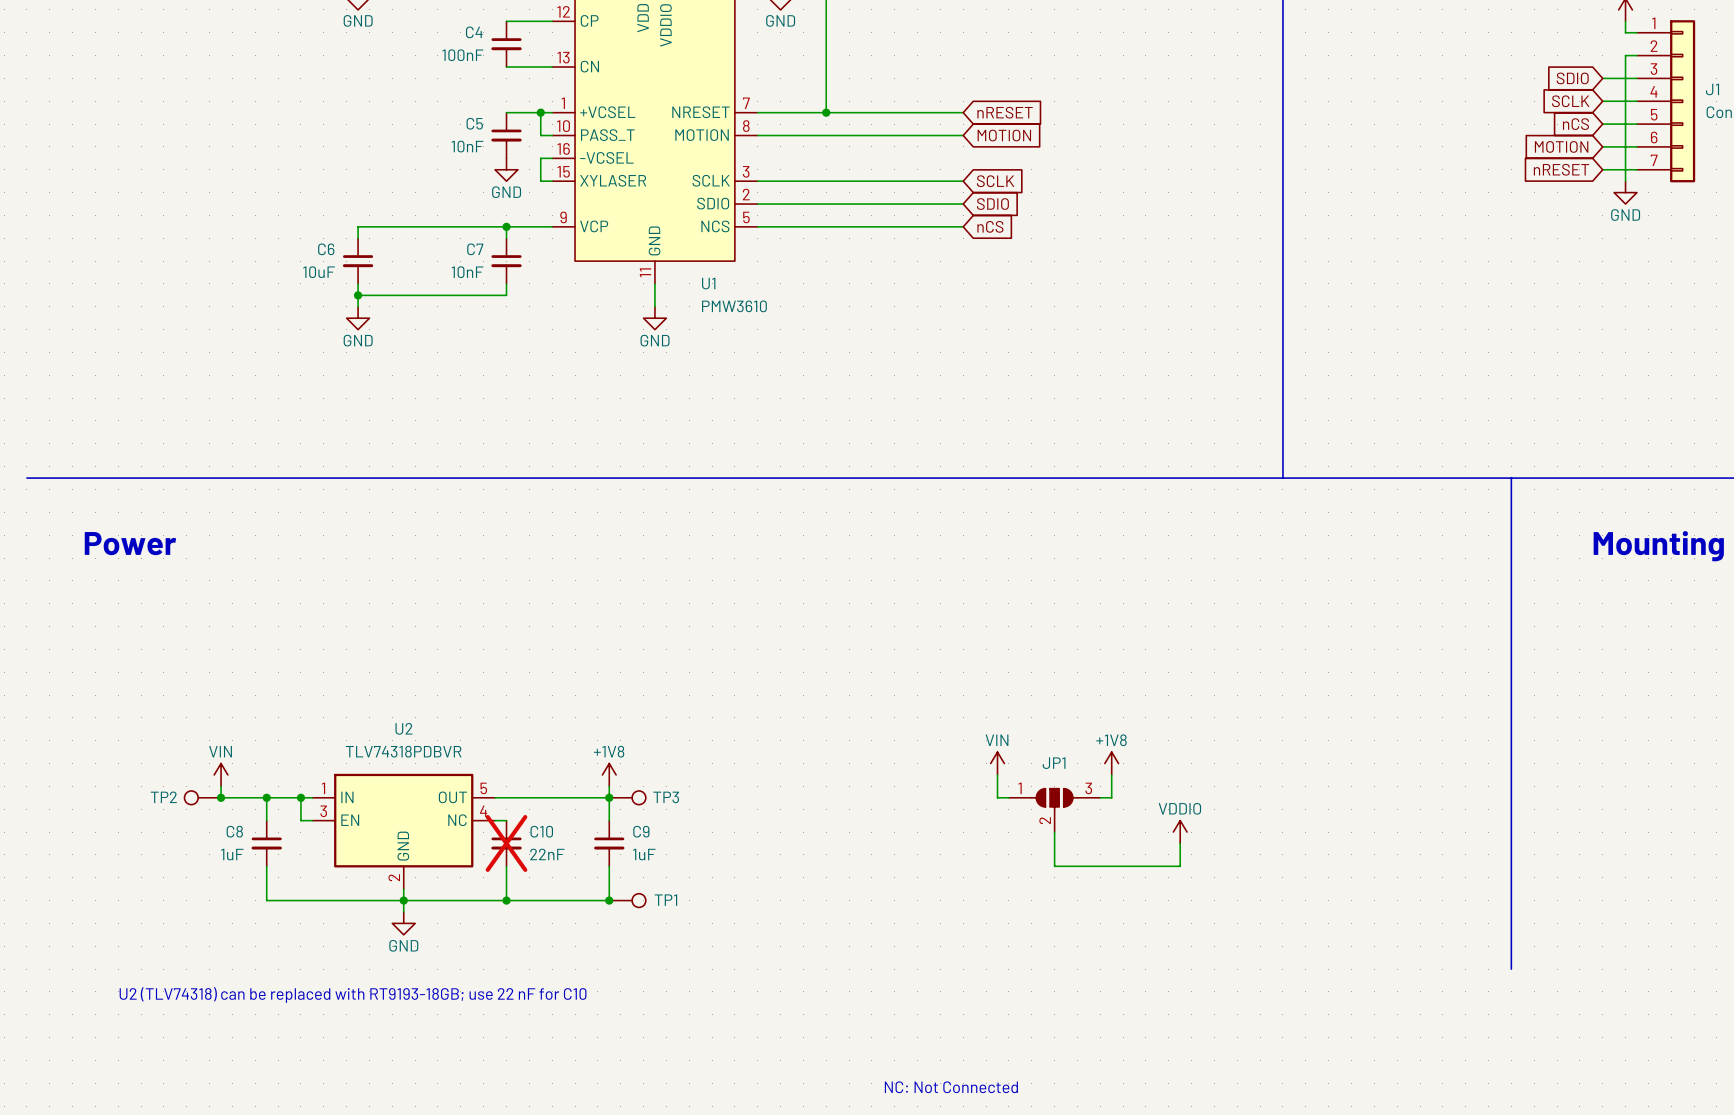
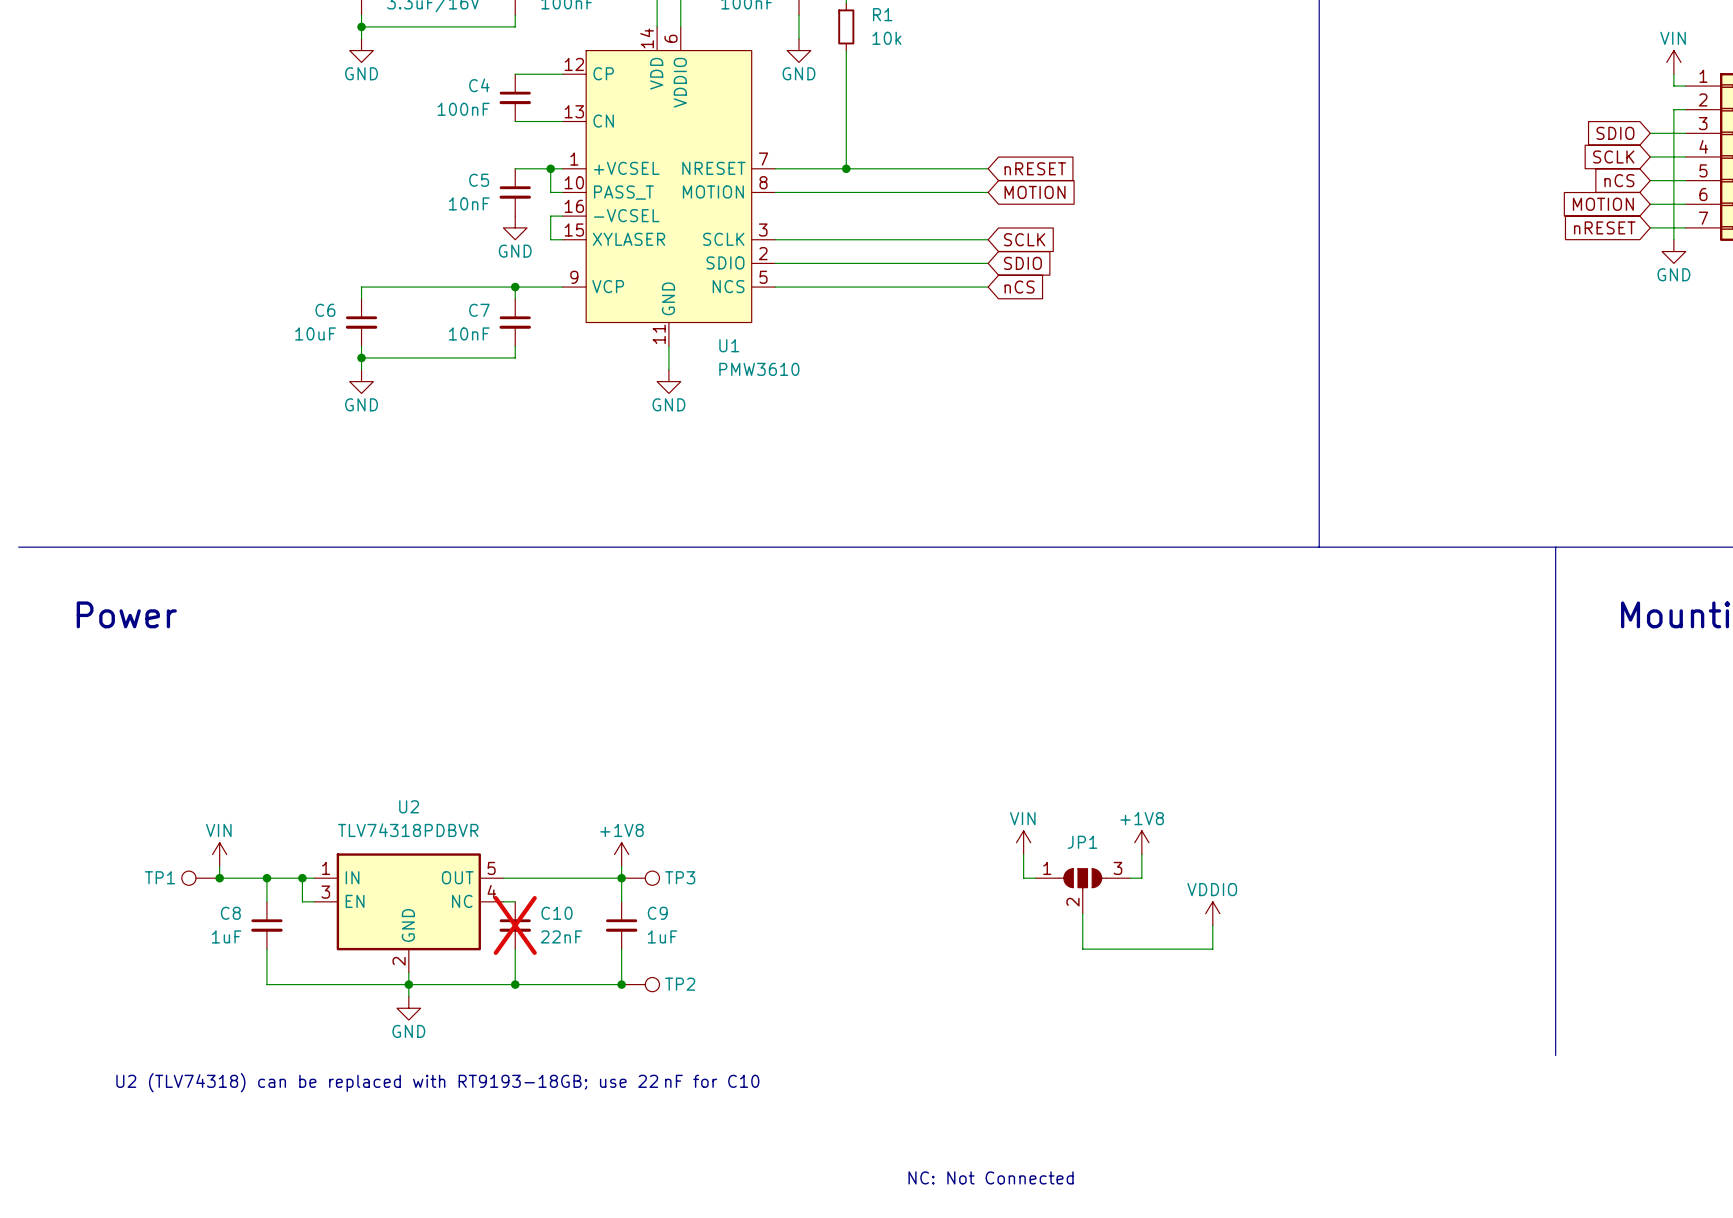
TP2 name: TP2 (163, 797) -> TP1 (159, 877)
TP1 name: TP1 (665, 900) -> TP2 (680, 984)

